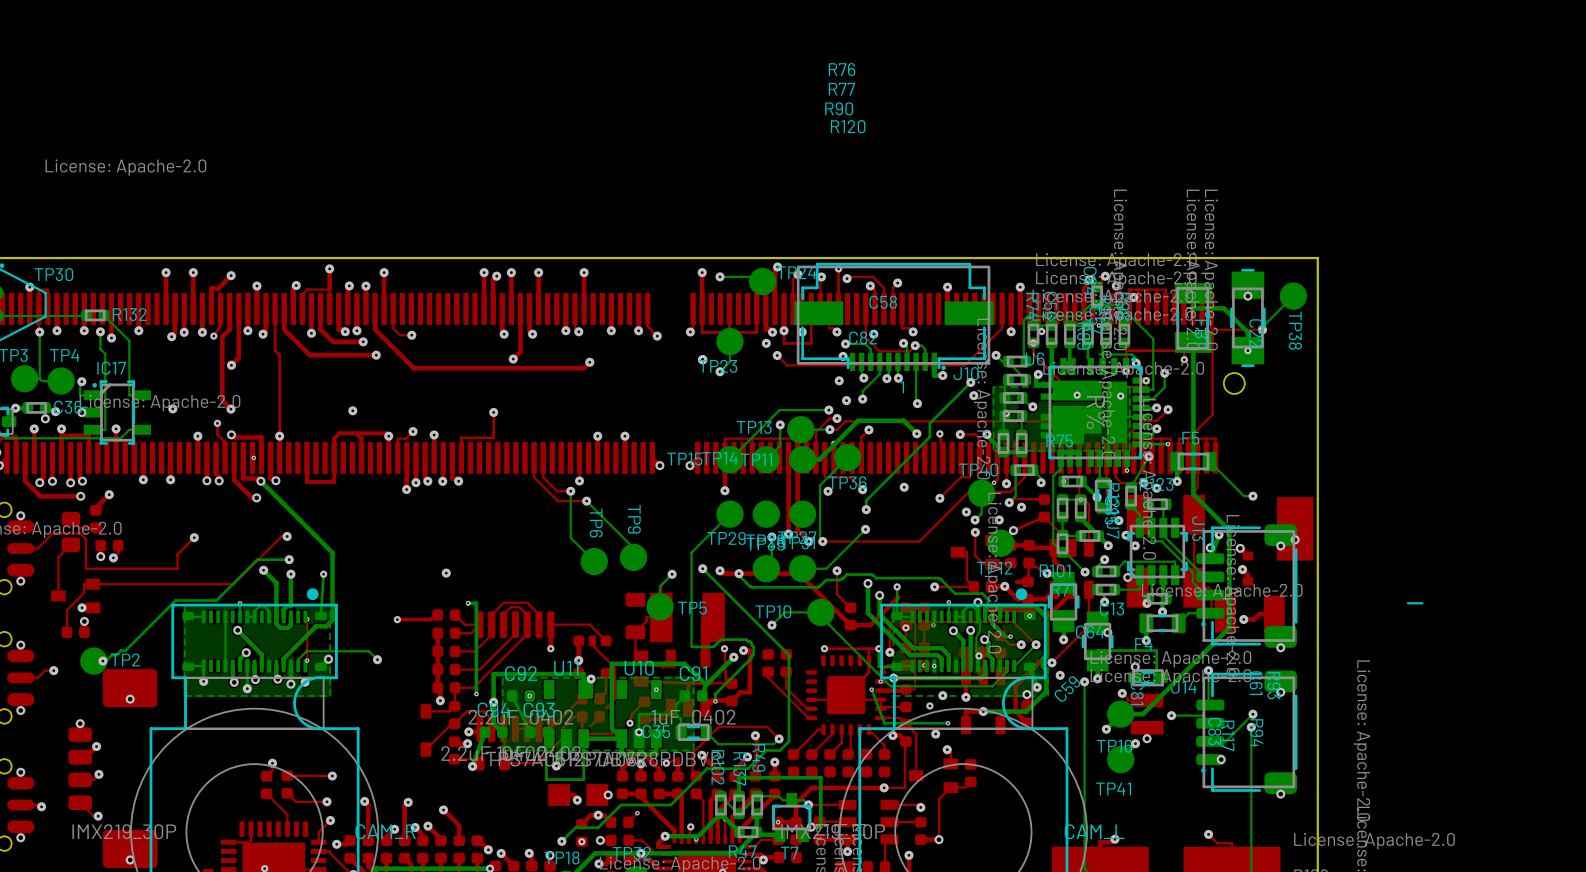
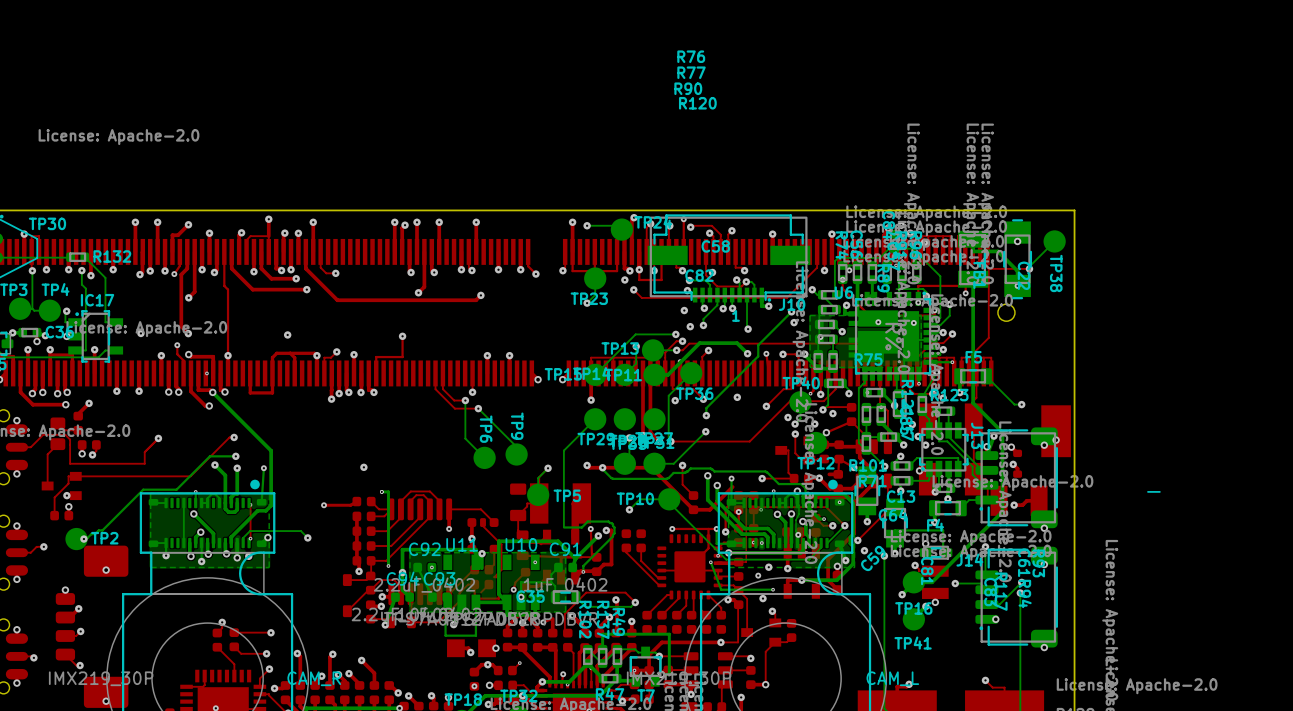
via: (702, 359) -> none
bottom track: (702, 568) (789, 655) (789, 741) (779, 750) (766, 750) (748, 768) (707, 768) (670, 805) (620, 805) (598, 827) (575, 827) (561, 841) -> none
via: (702, 568) -> none
via: (561, 841) -> none

